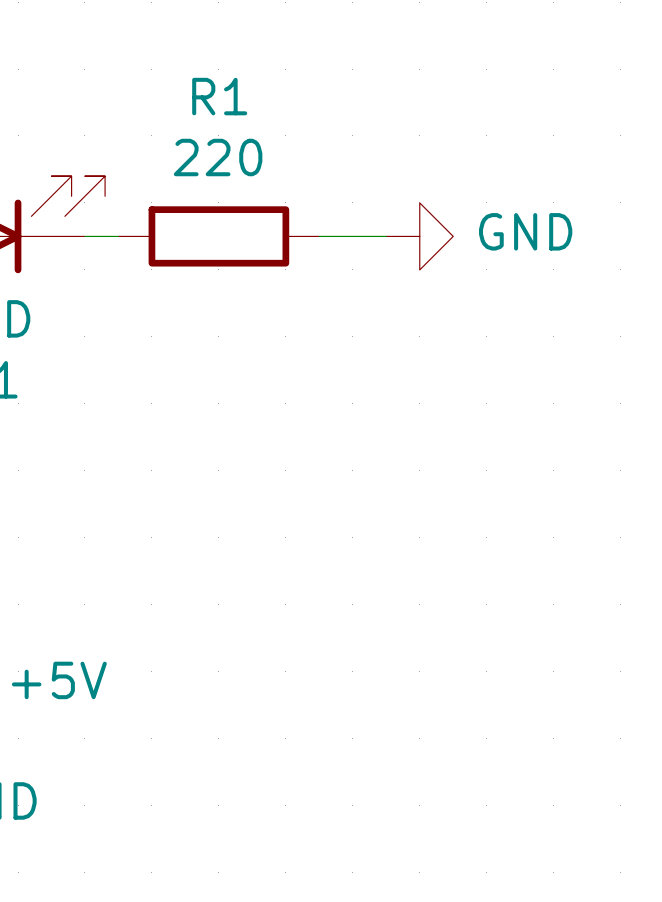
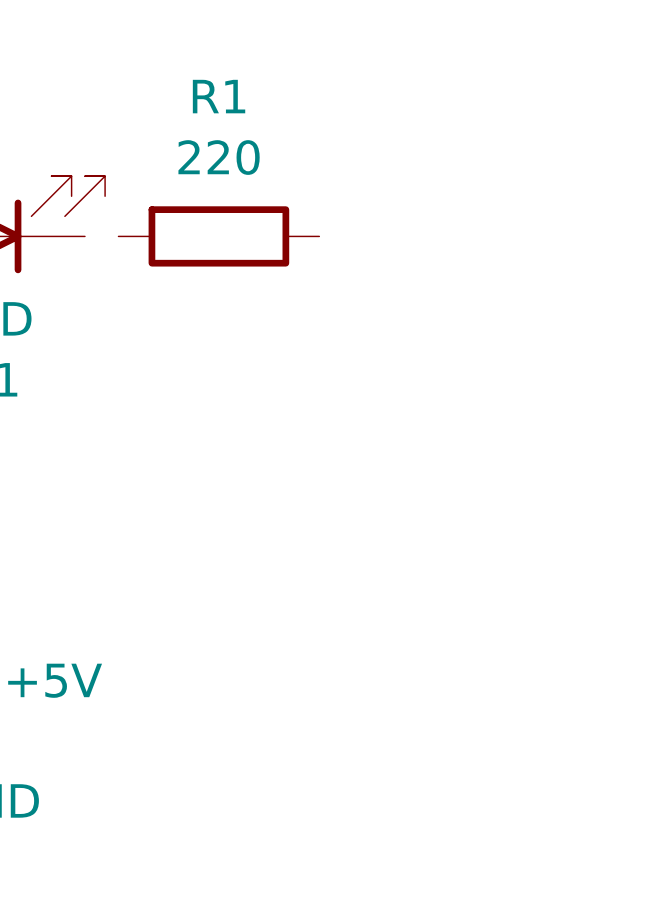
wire: (84, 236) (118, 236) -> none
wire: (319, 236) (386, 236) -> none
power symbol: GND (419, 236) -> none

